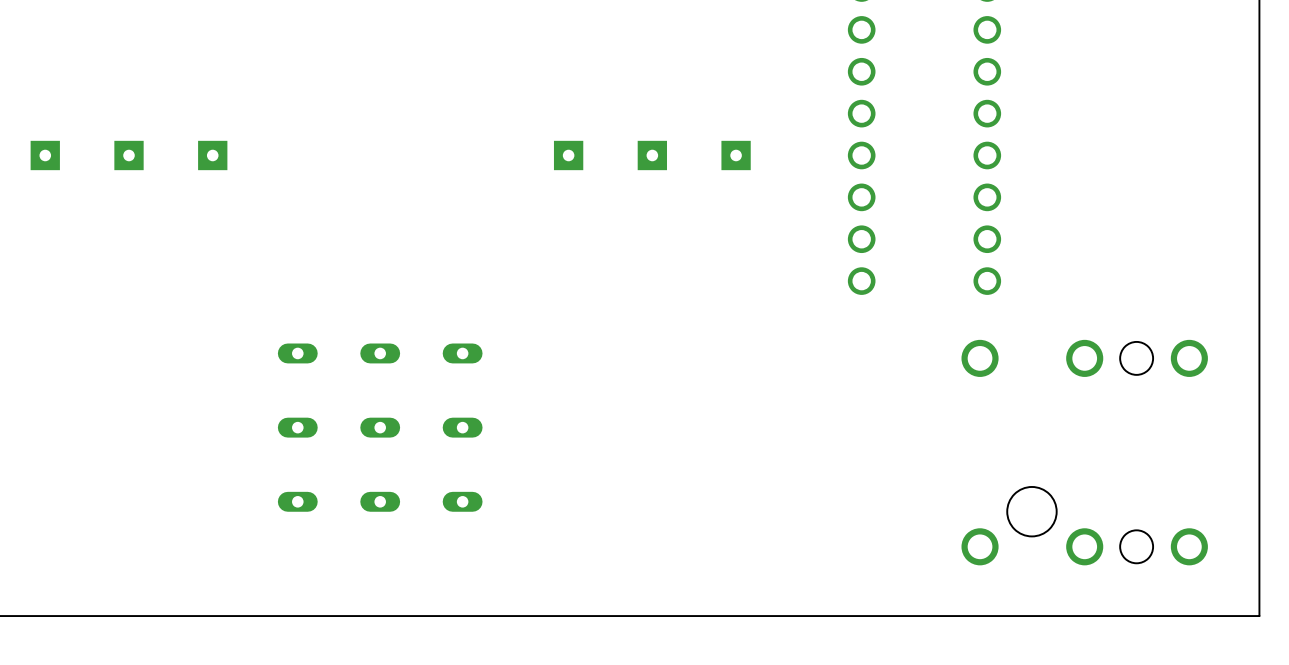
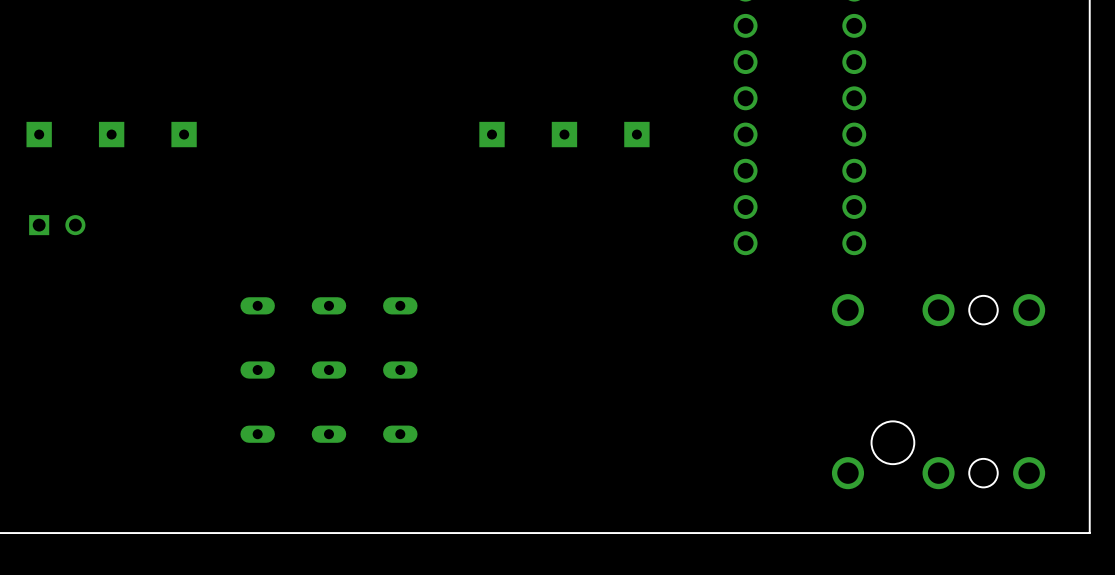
part: none -> (57, 225)

